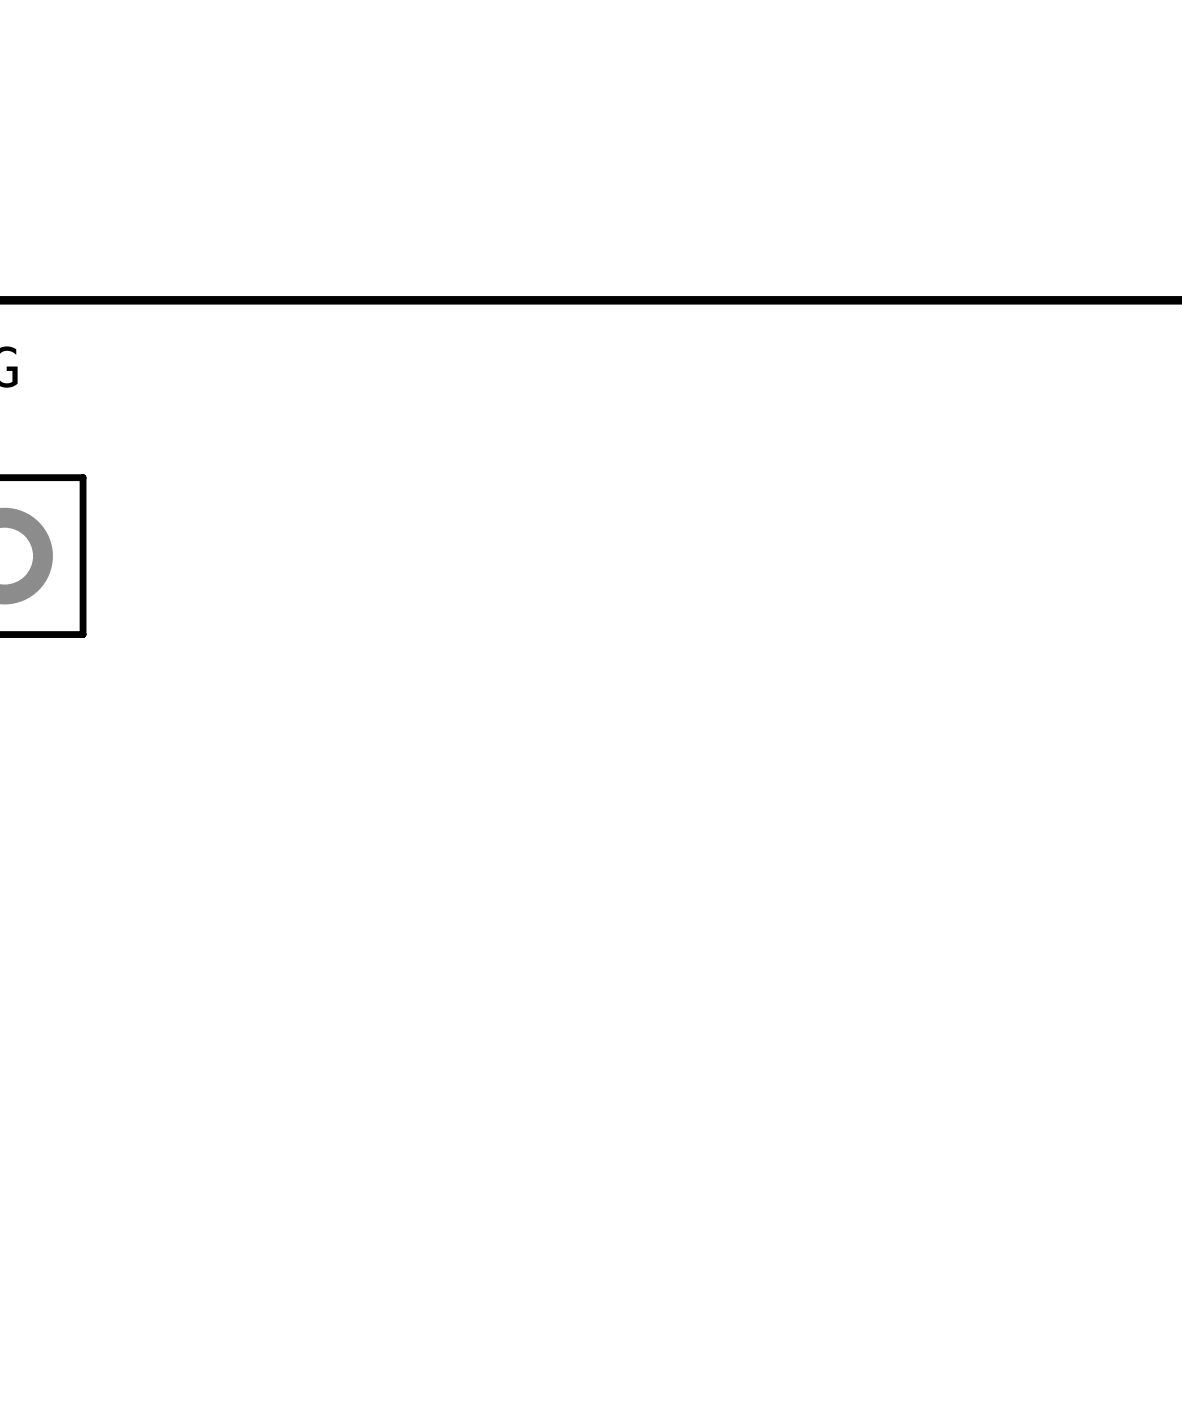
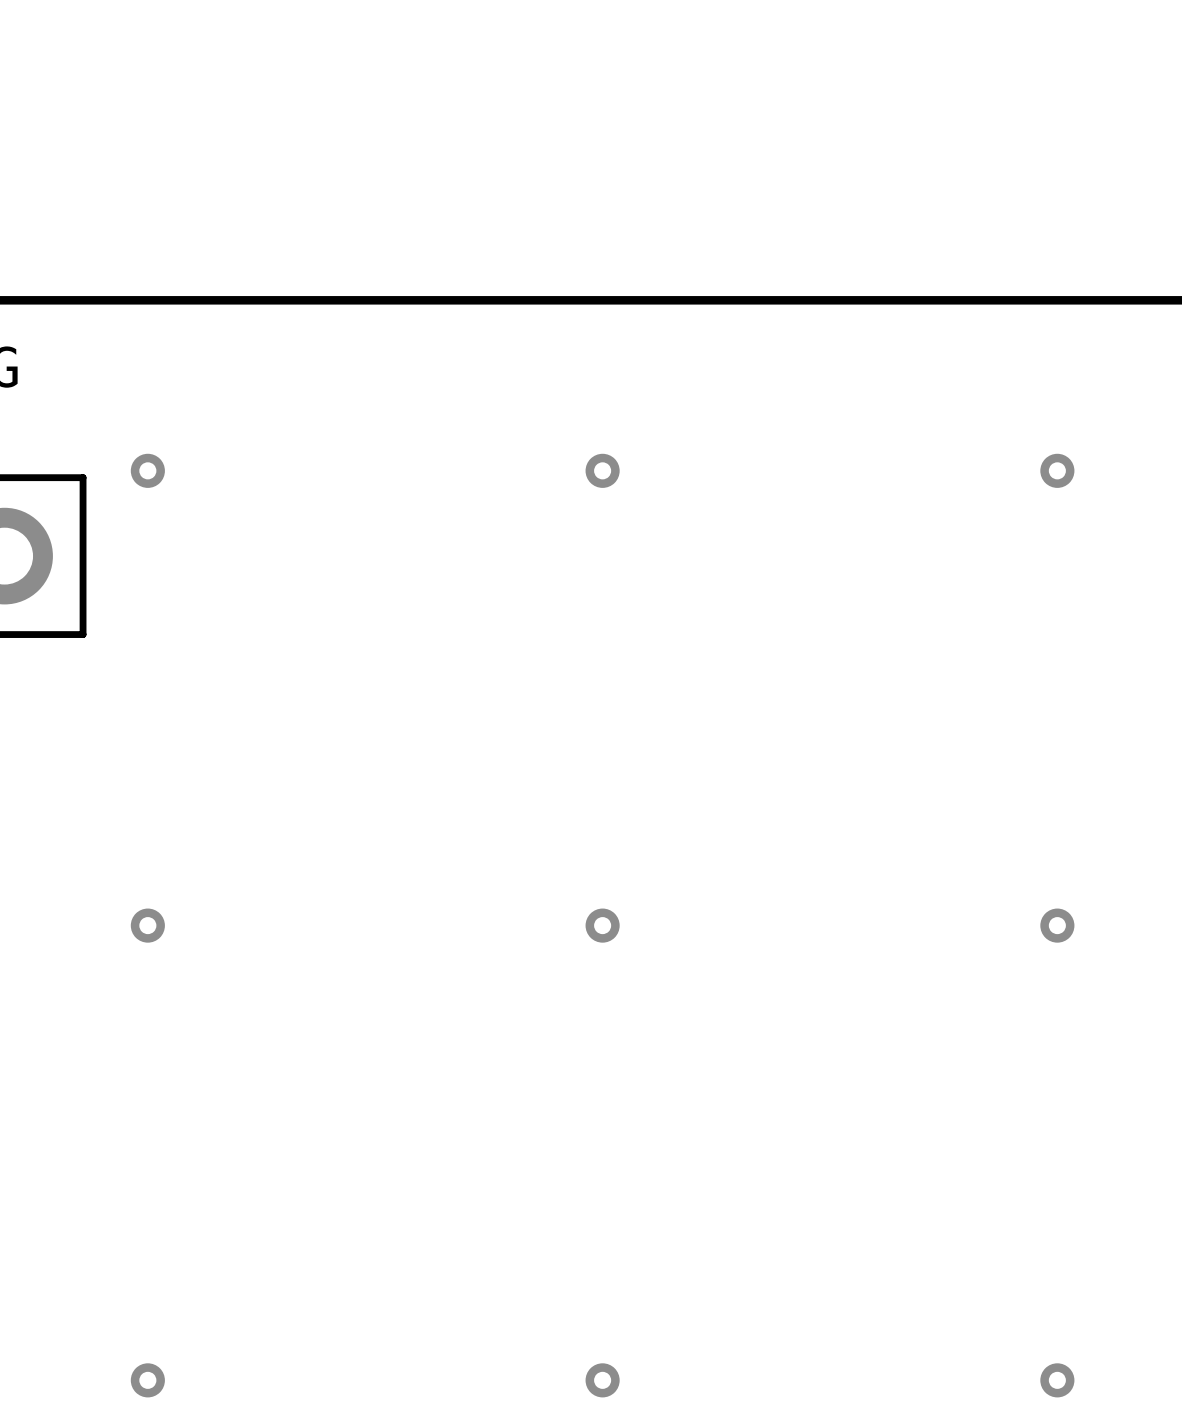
via: none -> (147, 470)
via: none -> (602, 470)
via: none -> (1057, 470)
via: none -> (147, 925)
via: none -> (602, 925)
via: none -> (1057, 925)
via: none -> (147, 1380)
via: none -> (602, 1380)
via: none -> (1057, 1380)

